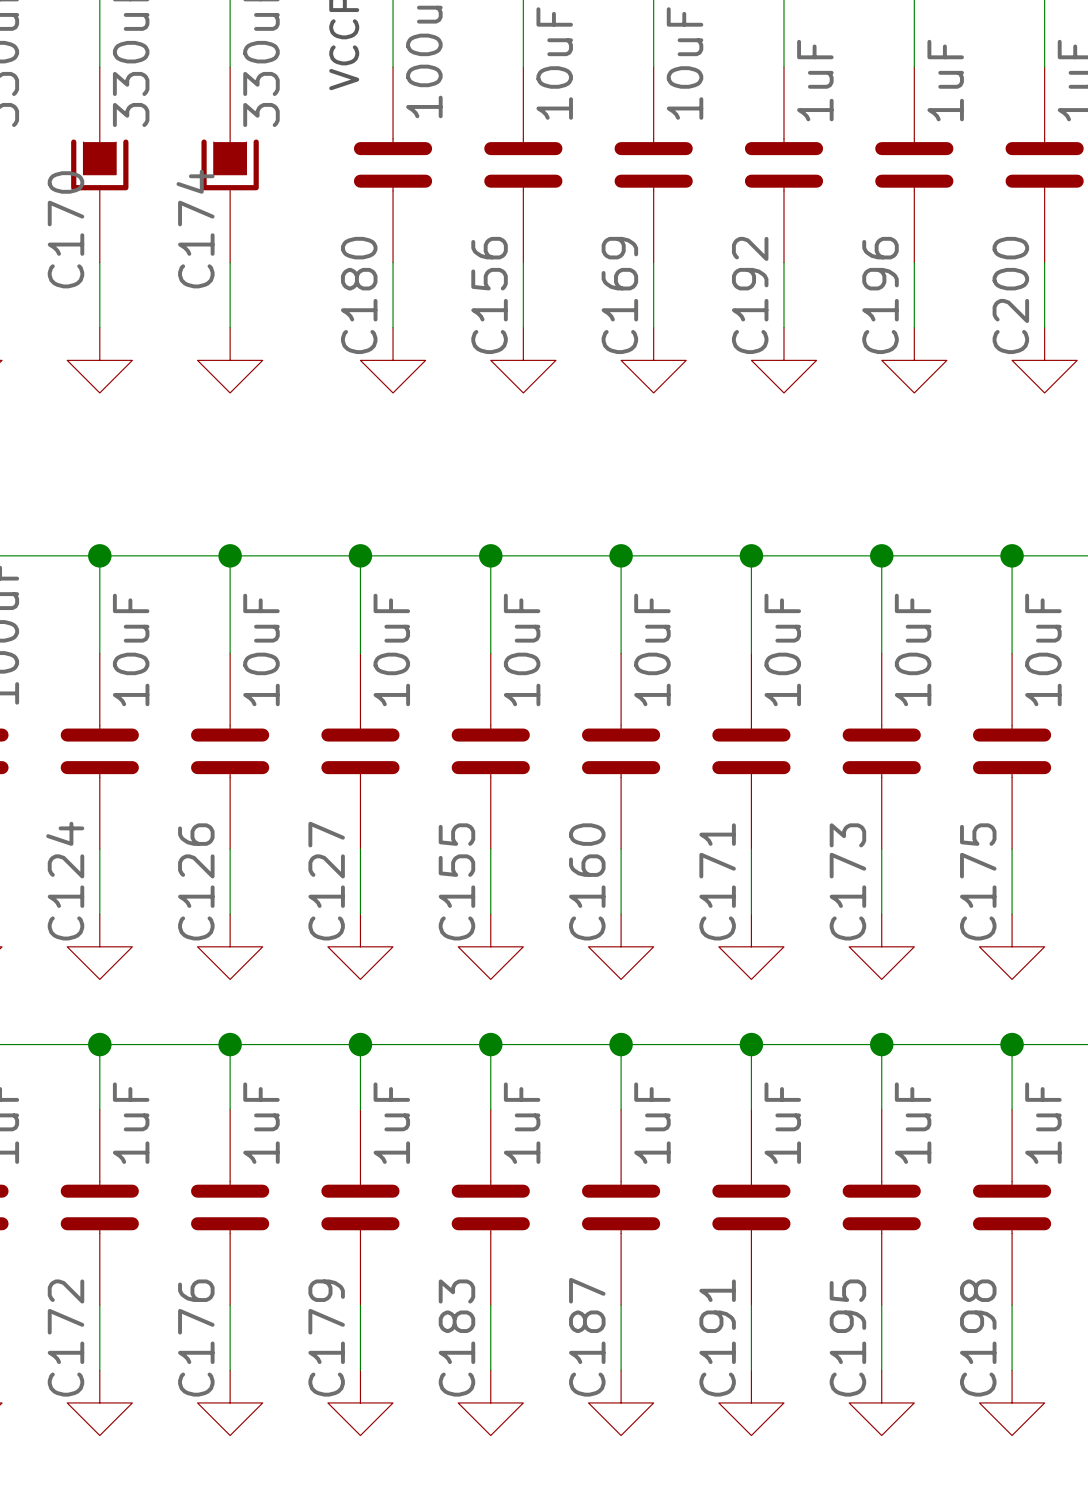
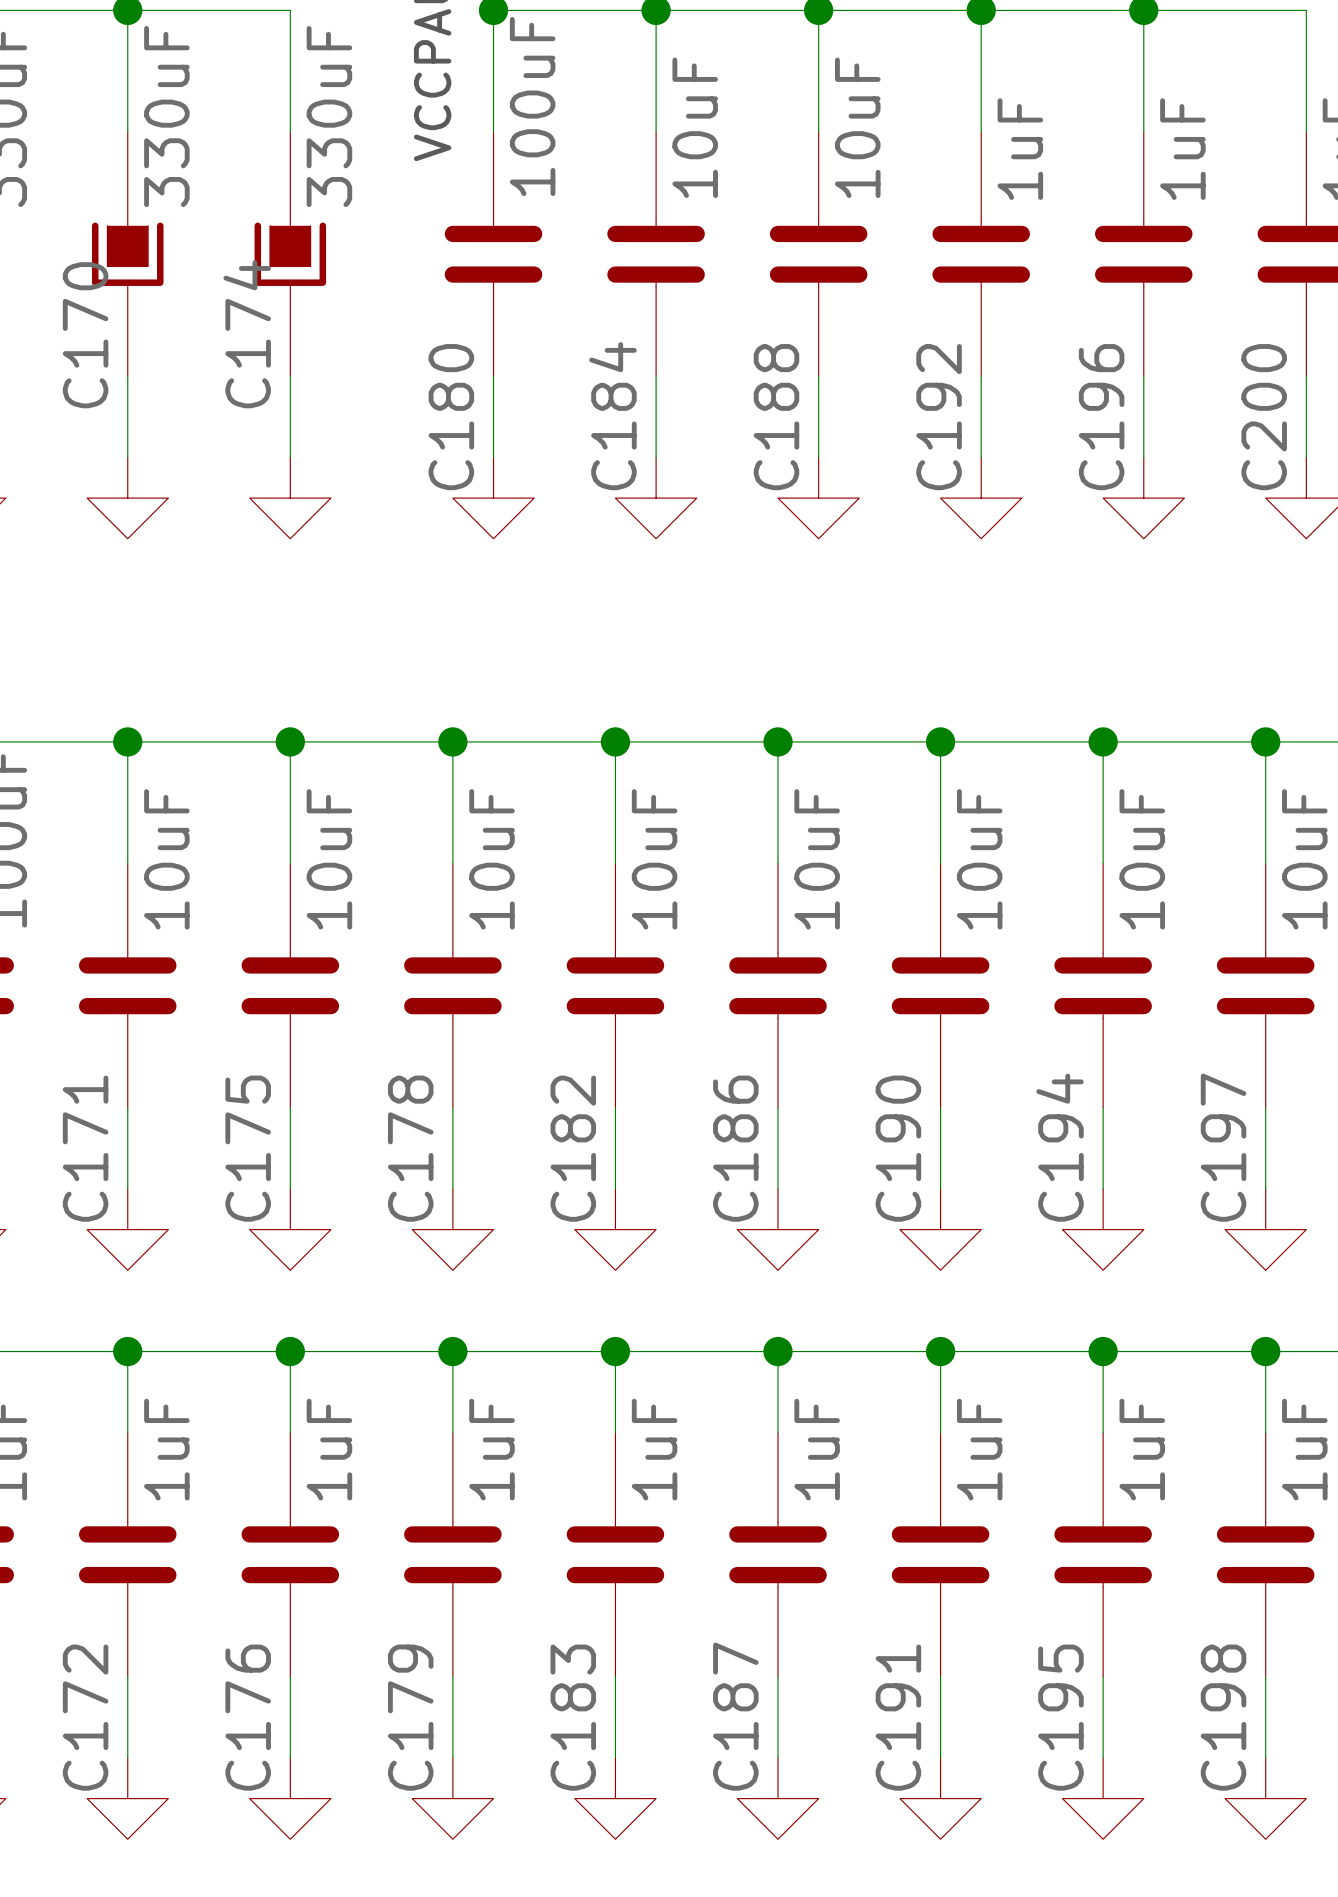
C156 name: C156 (489, 295) -> C184 (612, 416)
C169 name: C169 (619, 295) -> C188 (776, 417)
C124 name: C124 (65, 881) -> C171 (85, 1148)
C126 name: C126 (196, 881) -> C175 (248, 1148)
C127 name: C127 (326, 881) -> C178 (410, 1148)
C155 name: C155 (456, 881) -> C182 (573, 1148)
C160 name: C160 (587, 881) -> C186 (735, 1148)
C171 name: C171 (717, 881) -> C190 (898, 1148)
C173 name: C173 (847, 881) -> C194 (1060, 1147)
C175 name: C175 (978, 881) -> C197 (1223, 1147)

